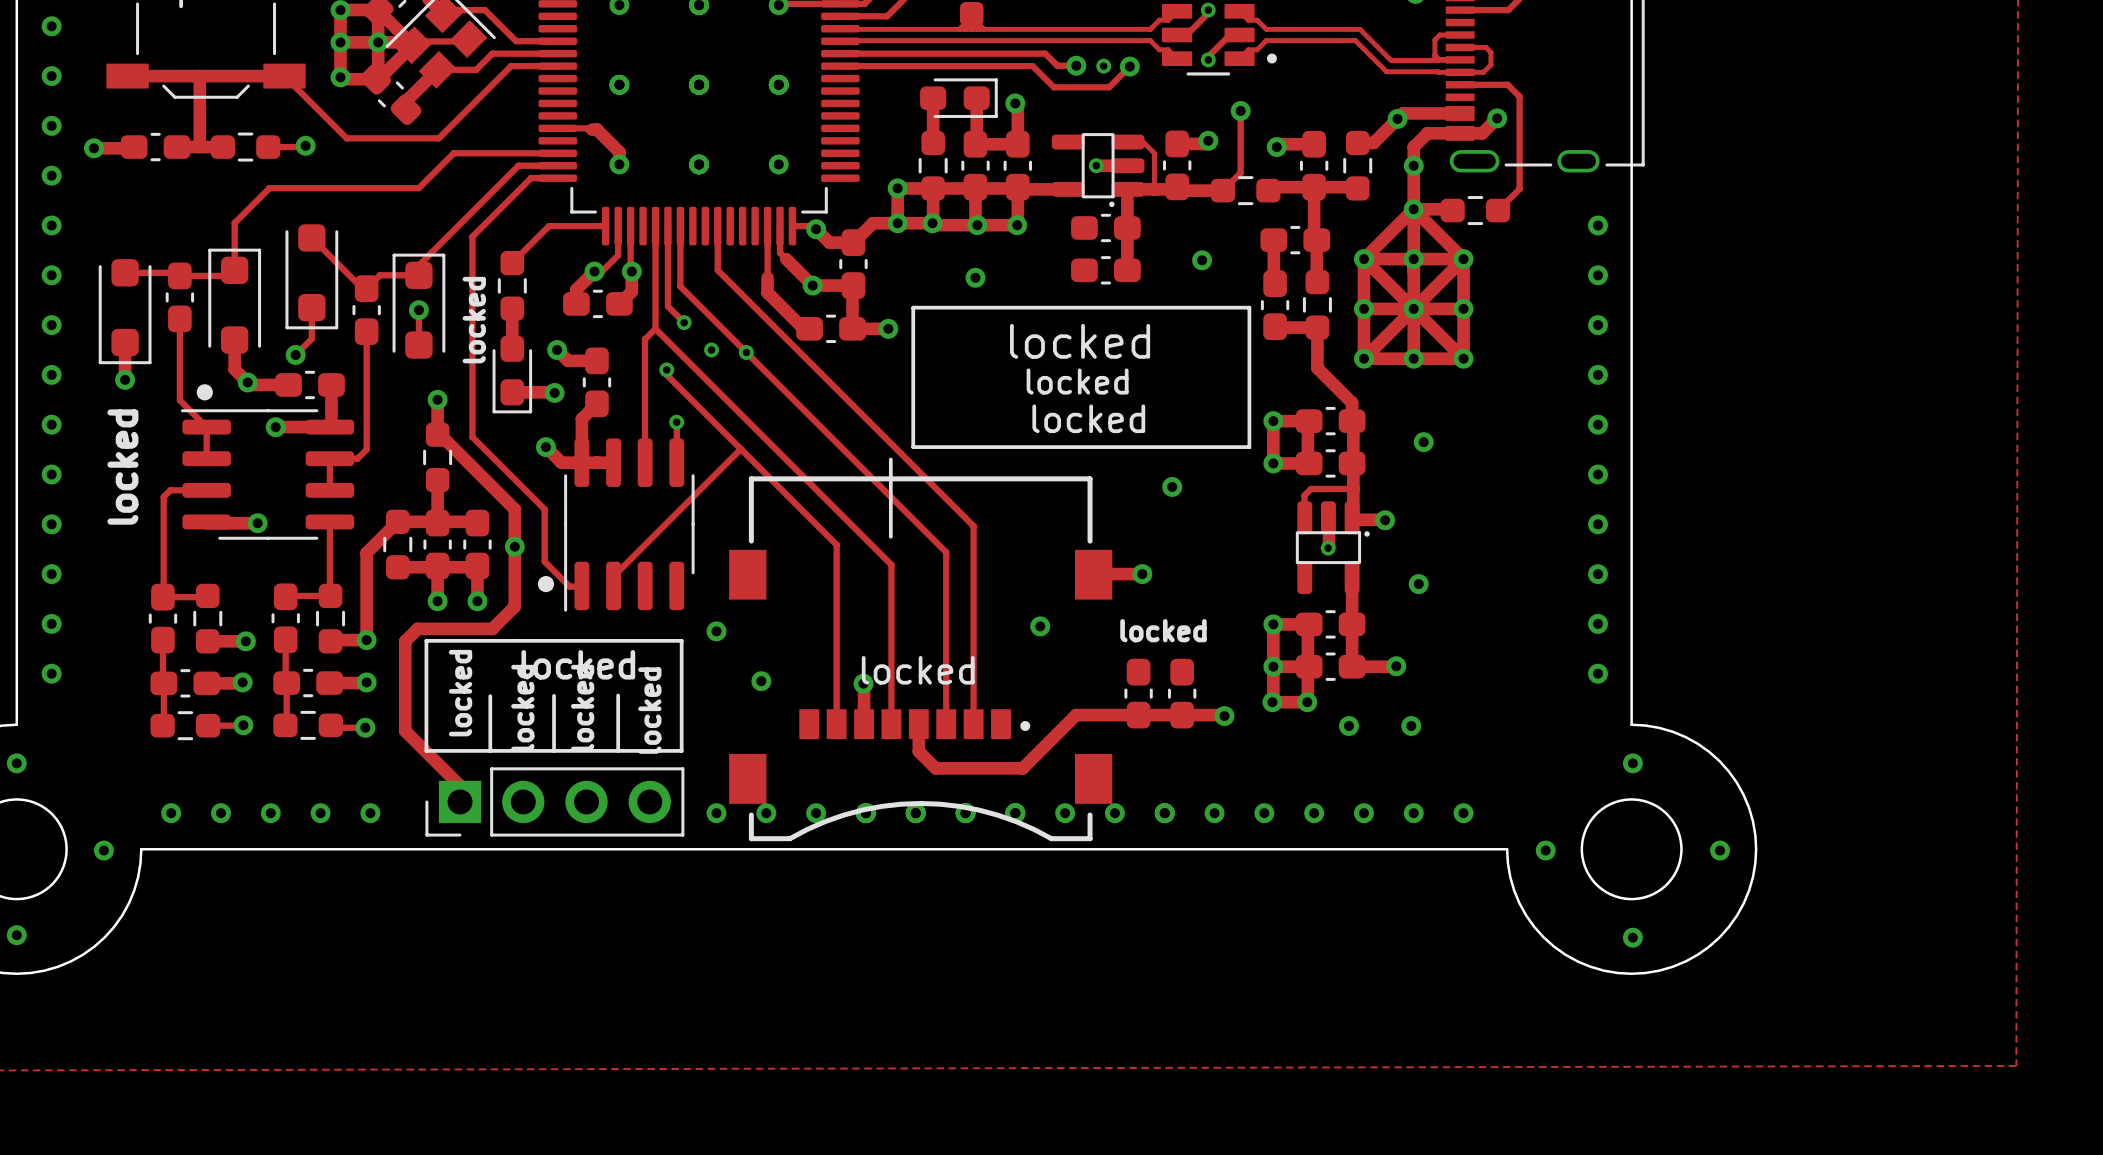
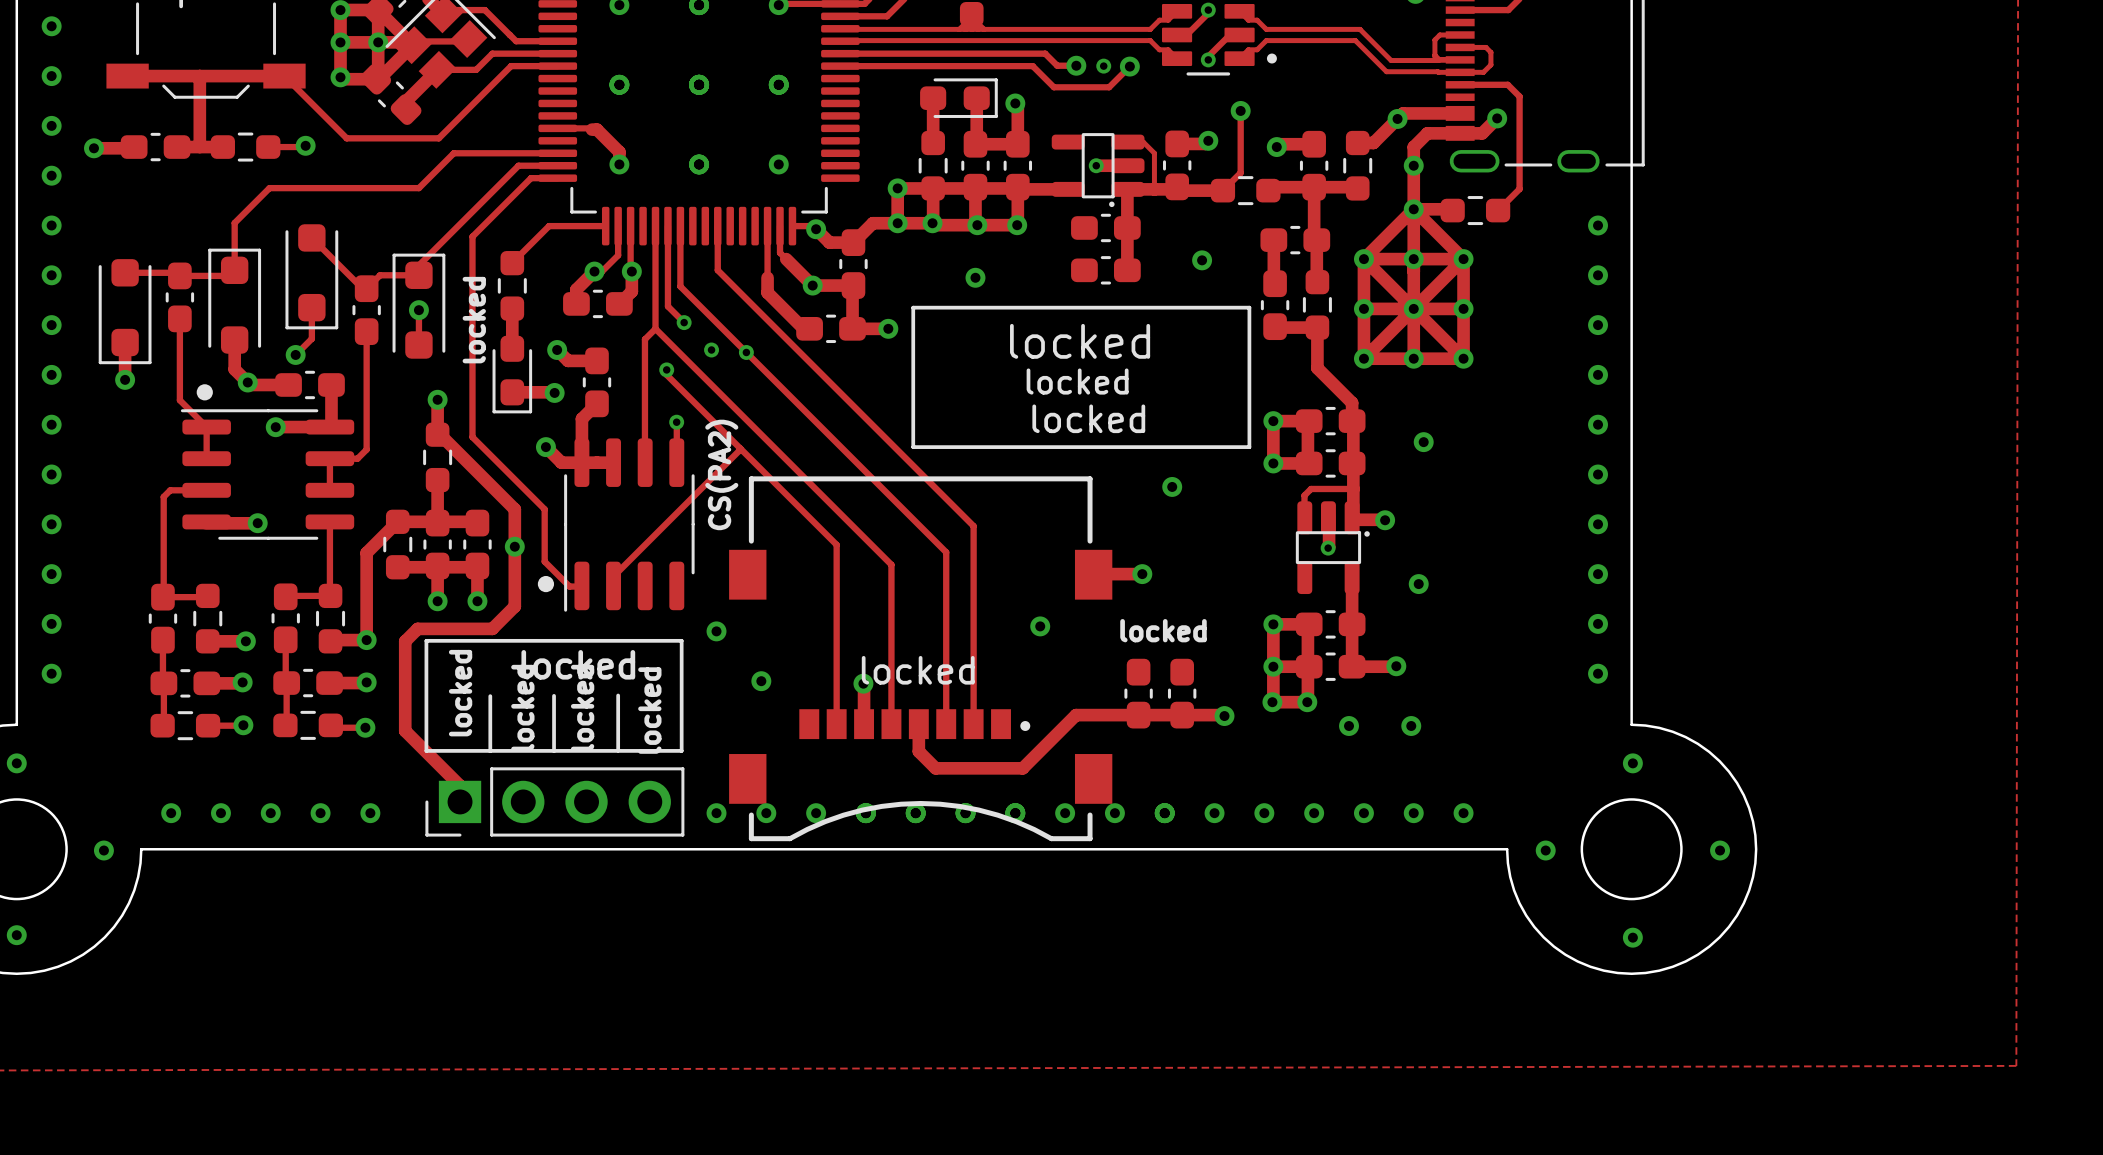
line: (890, 459) (890, 536) -> none
text: locked (122, 467) -> none
text: none -> CS(PA2) (721, 474)

